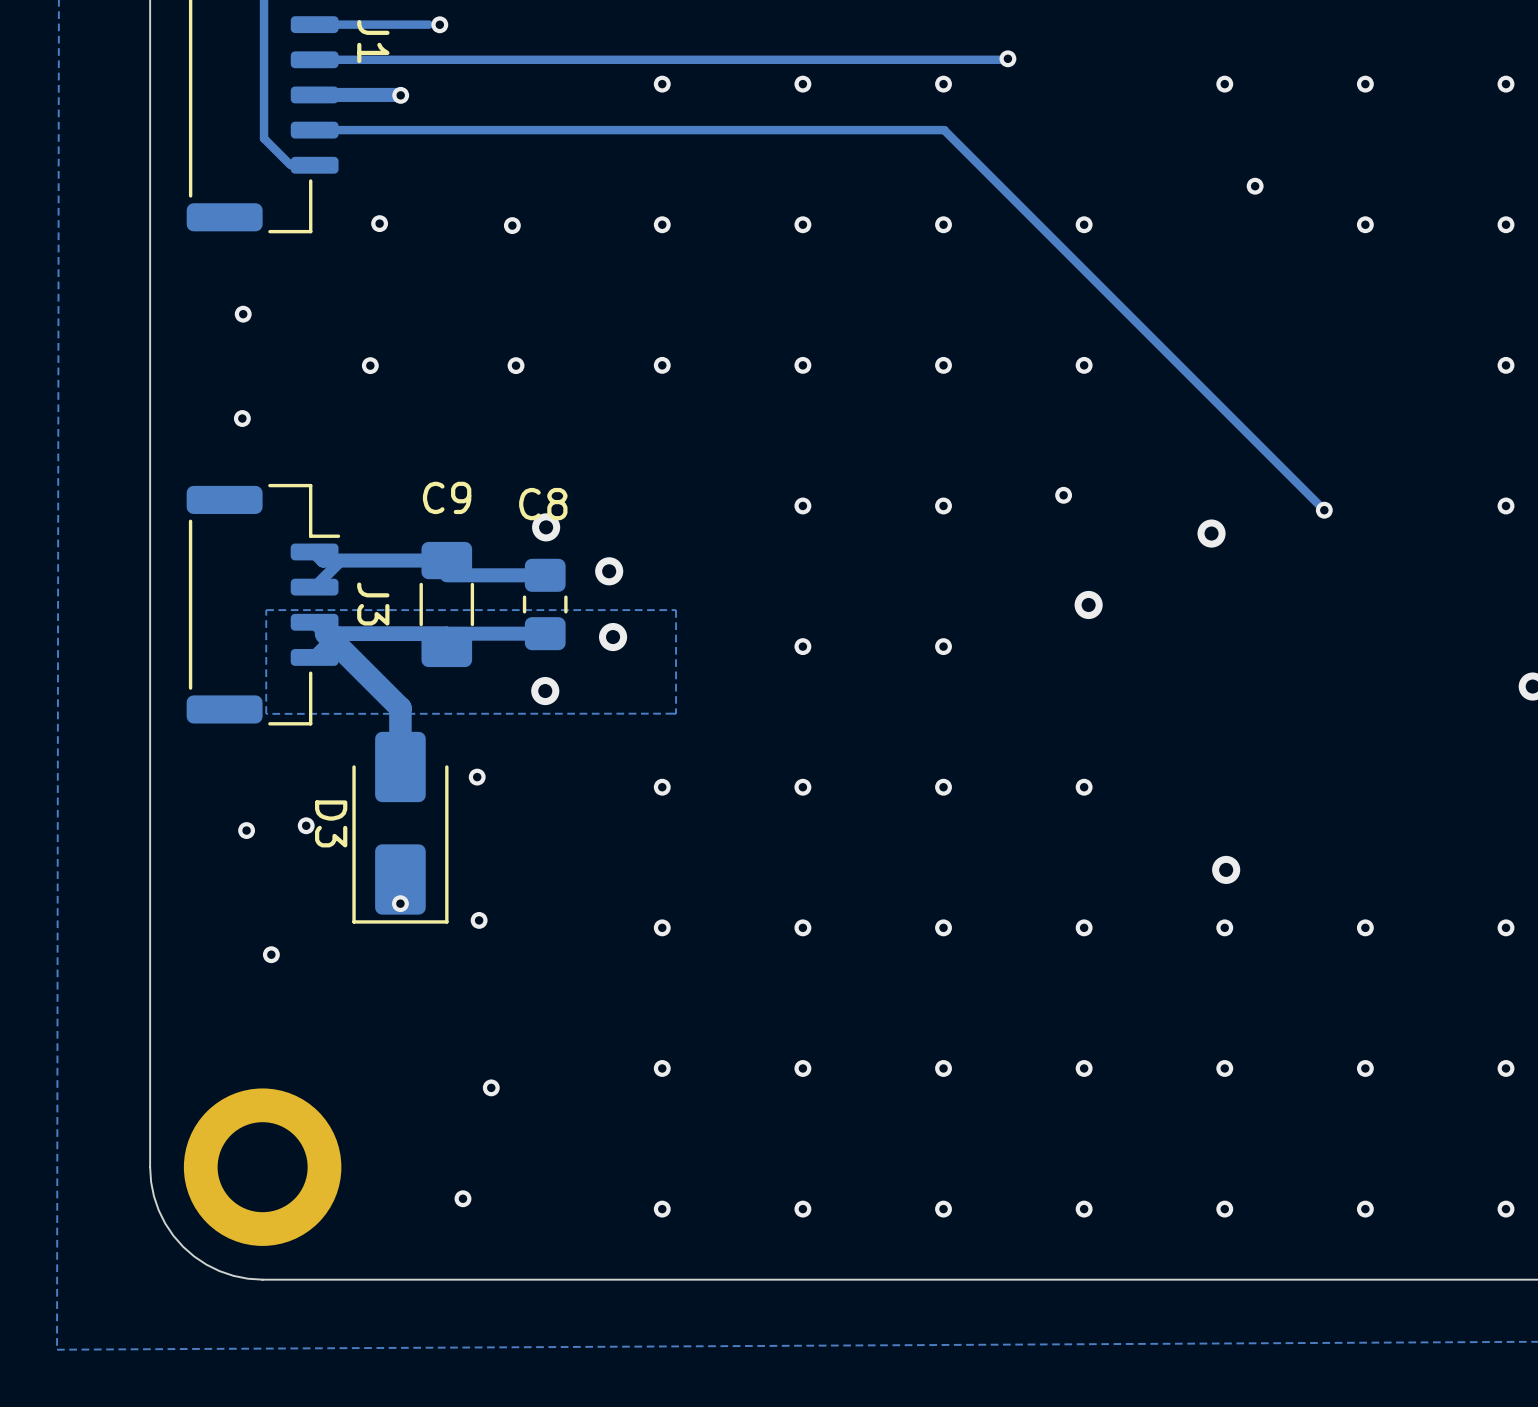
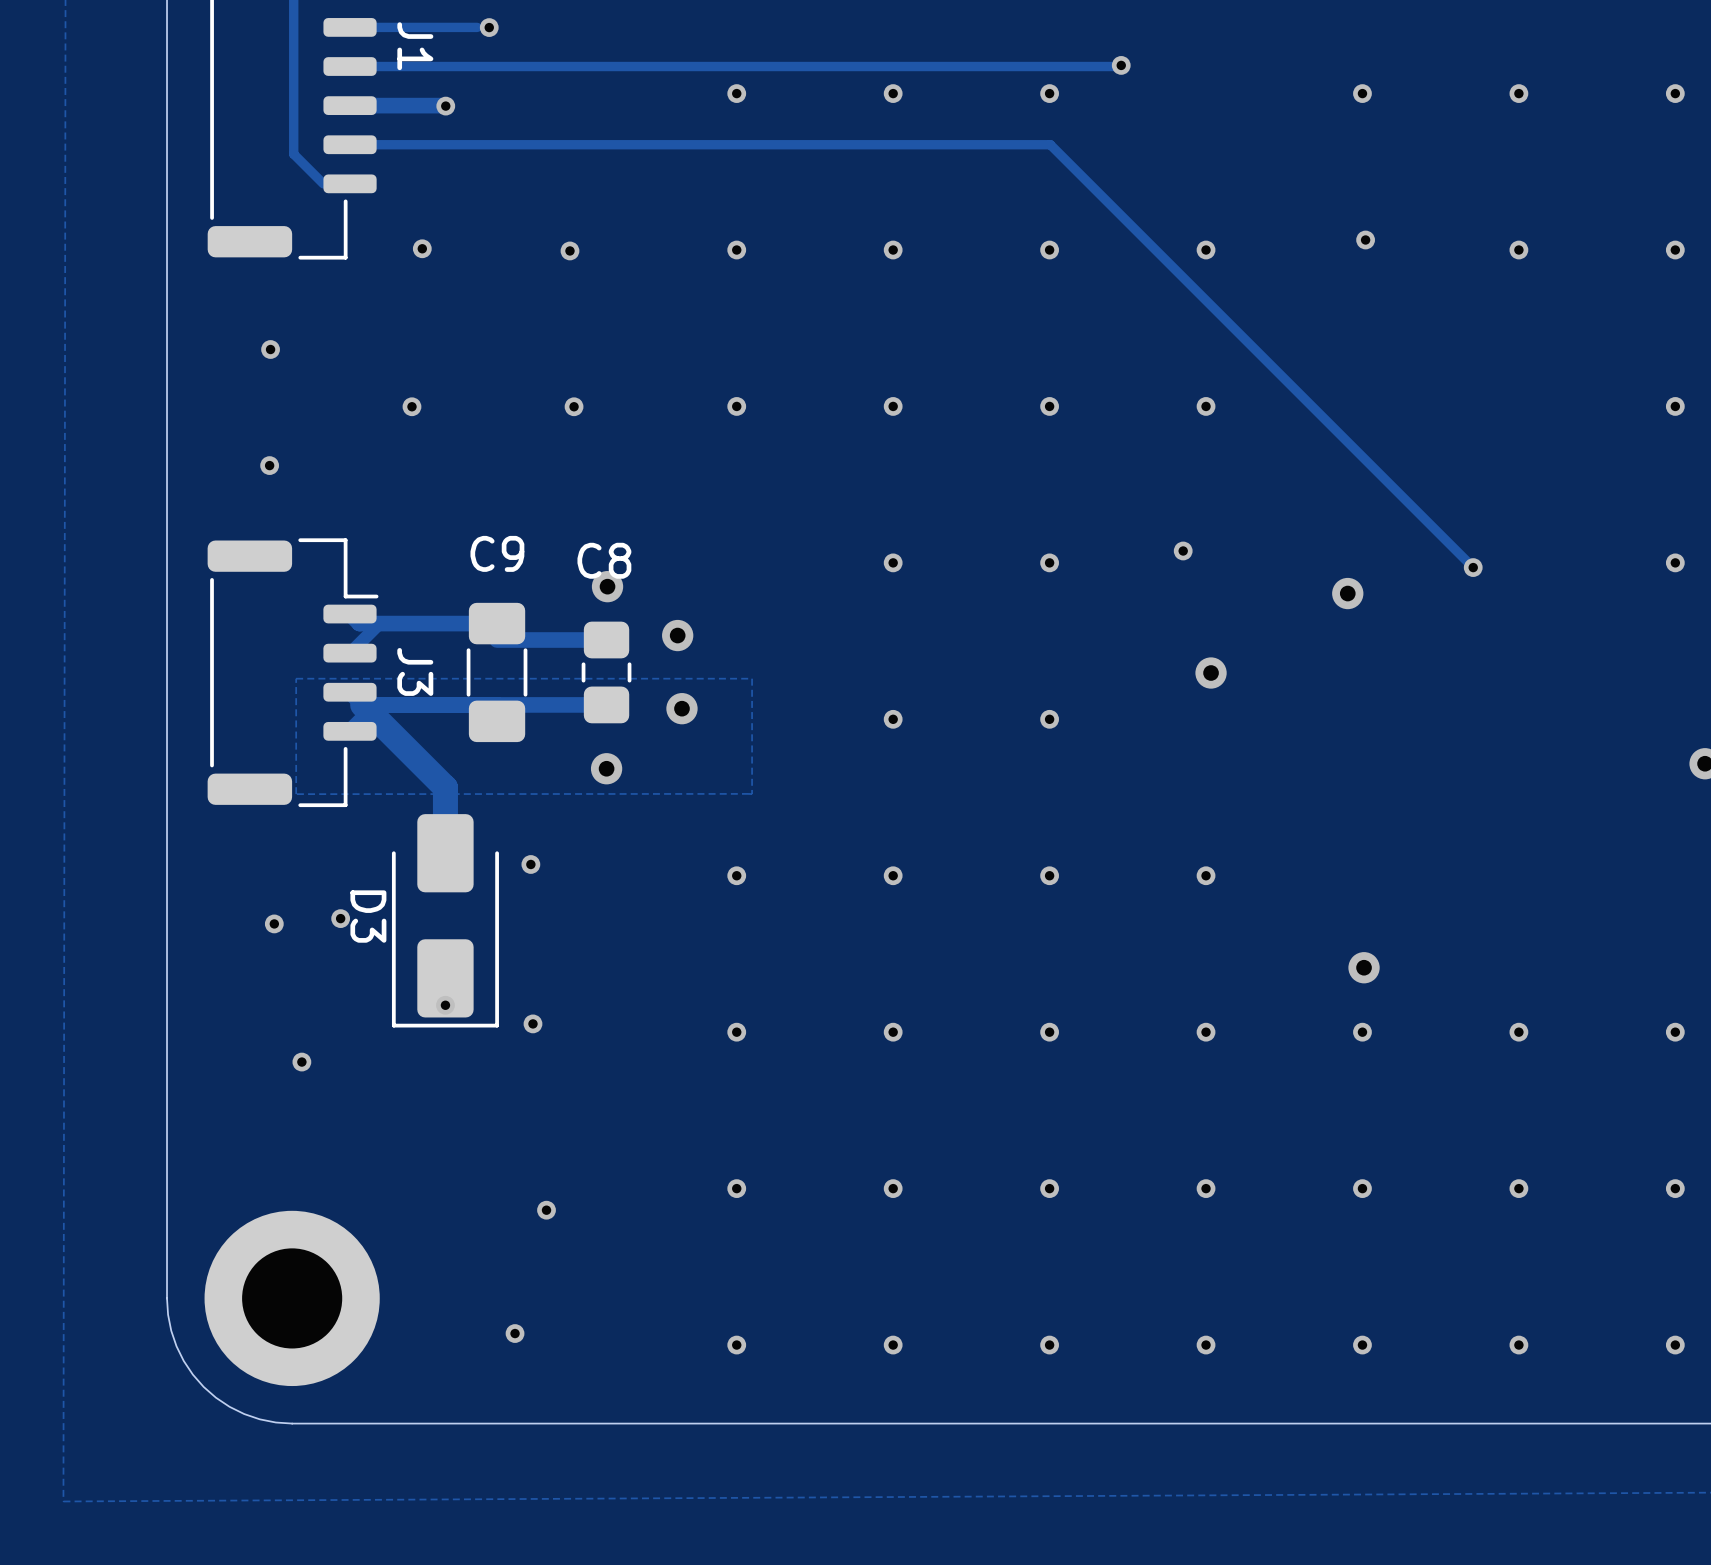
via position: (1255, 186) -> (1365, 240)

